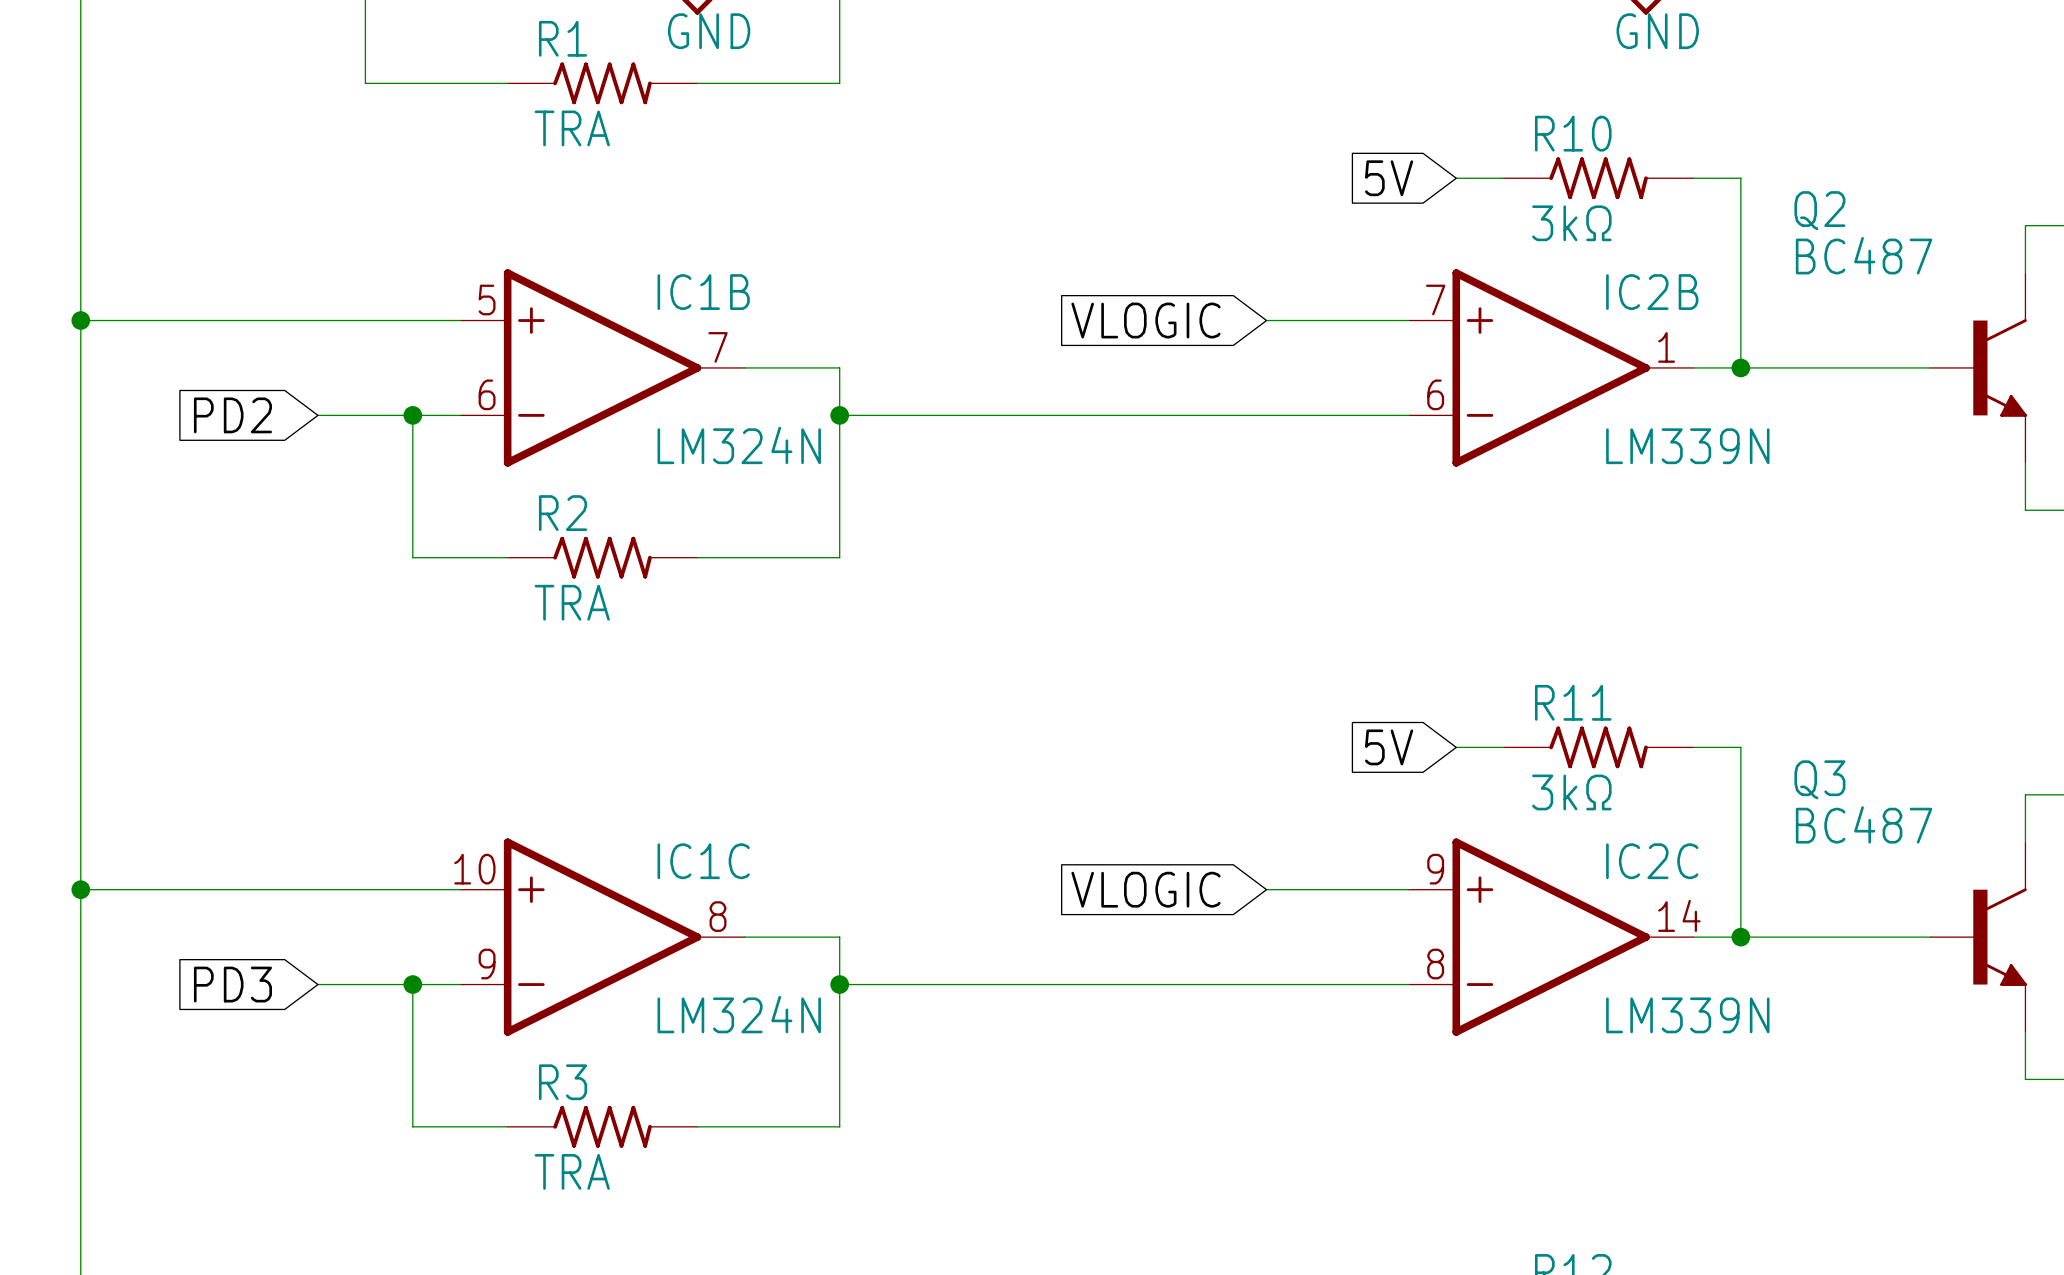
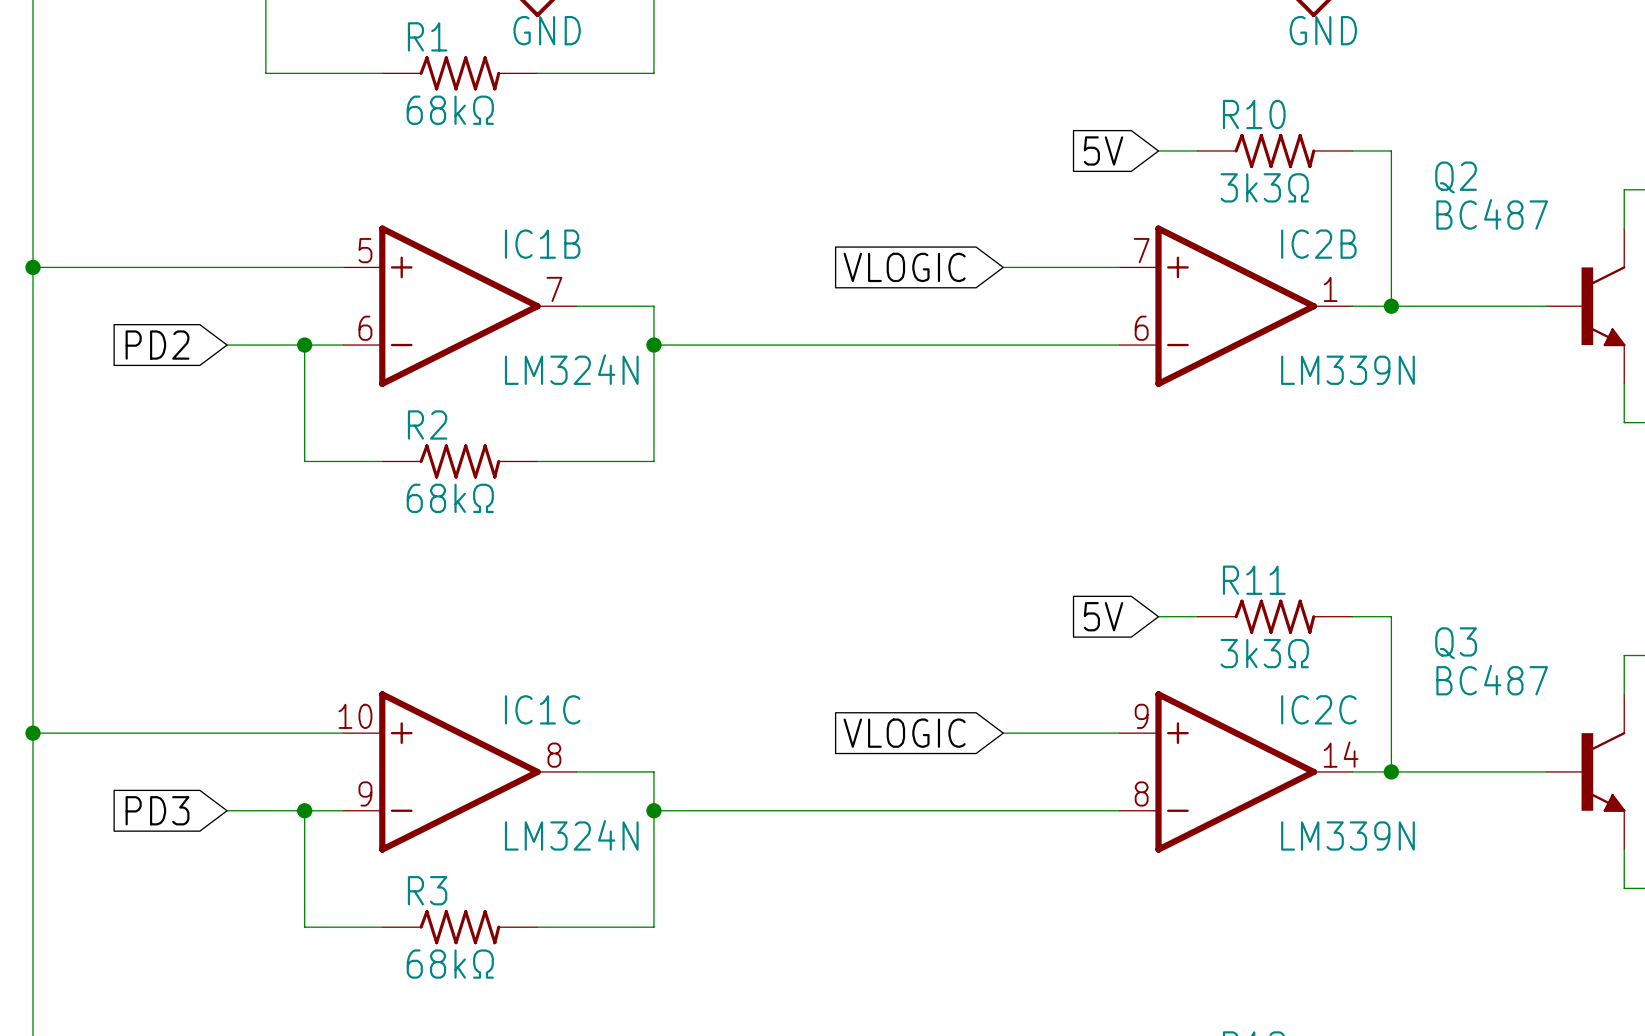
R1 value: TRA (572, 128) -> 68kΩ (450, 110)
R10 value: 3kΩ (1571, 223) -> 3k3Ω (1264, 187)
R2 value: TRA (572, 602) -> 68kΩ (450, 498)
R11 value: 3kΩ (1571, 792) -> 3k3Ω (1264, 653)
R3 value: TRA (572, 1171) -> 68kΩ (450, 964)

